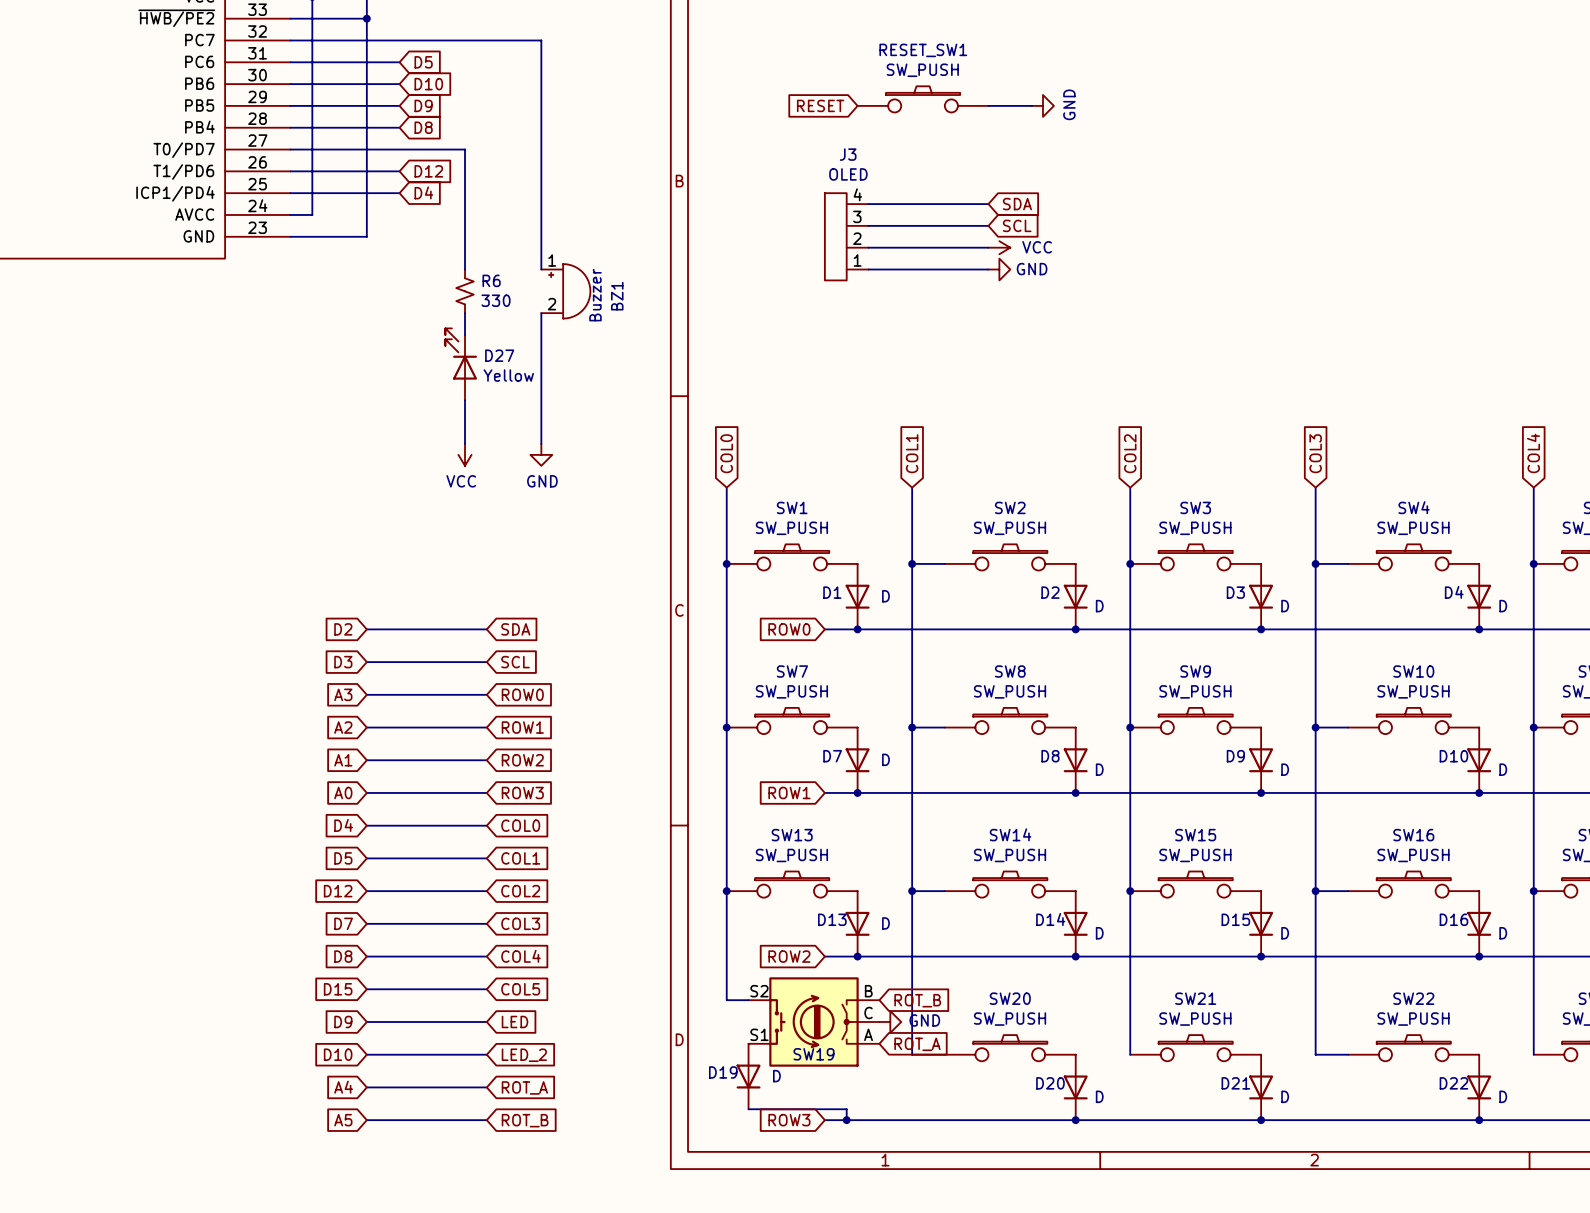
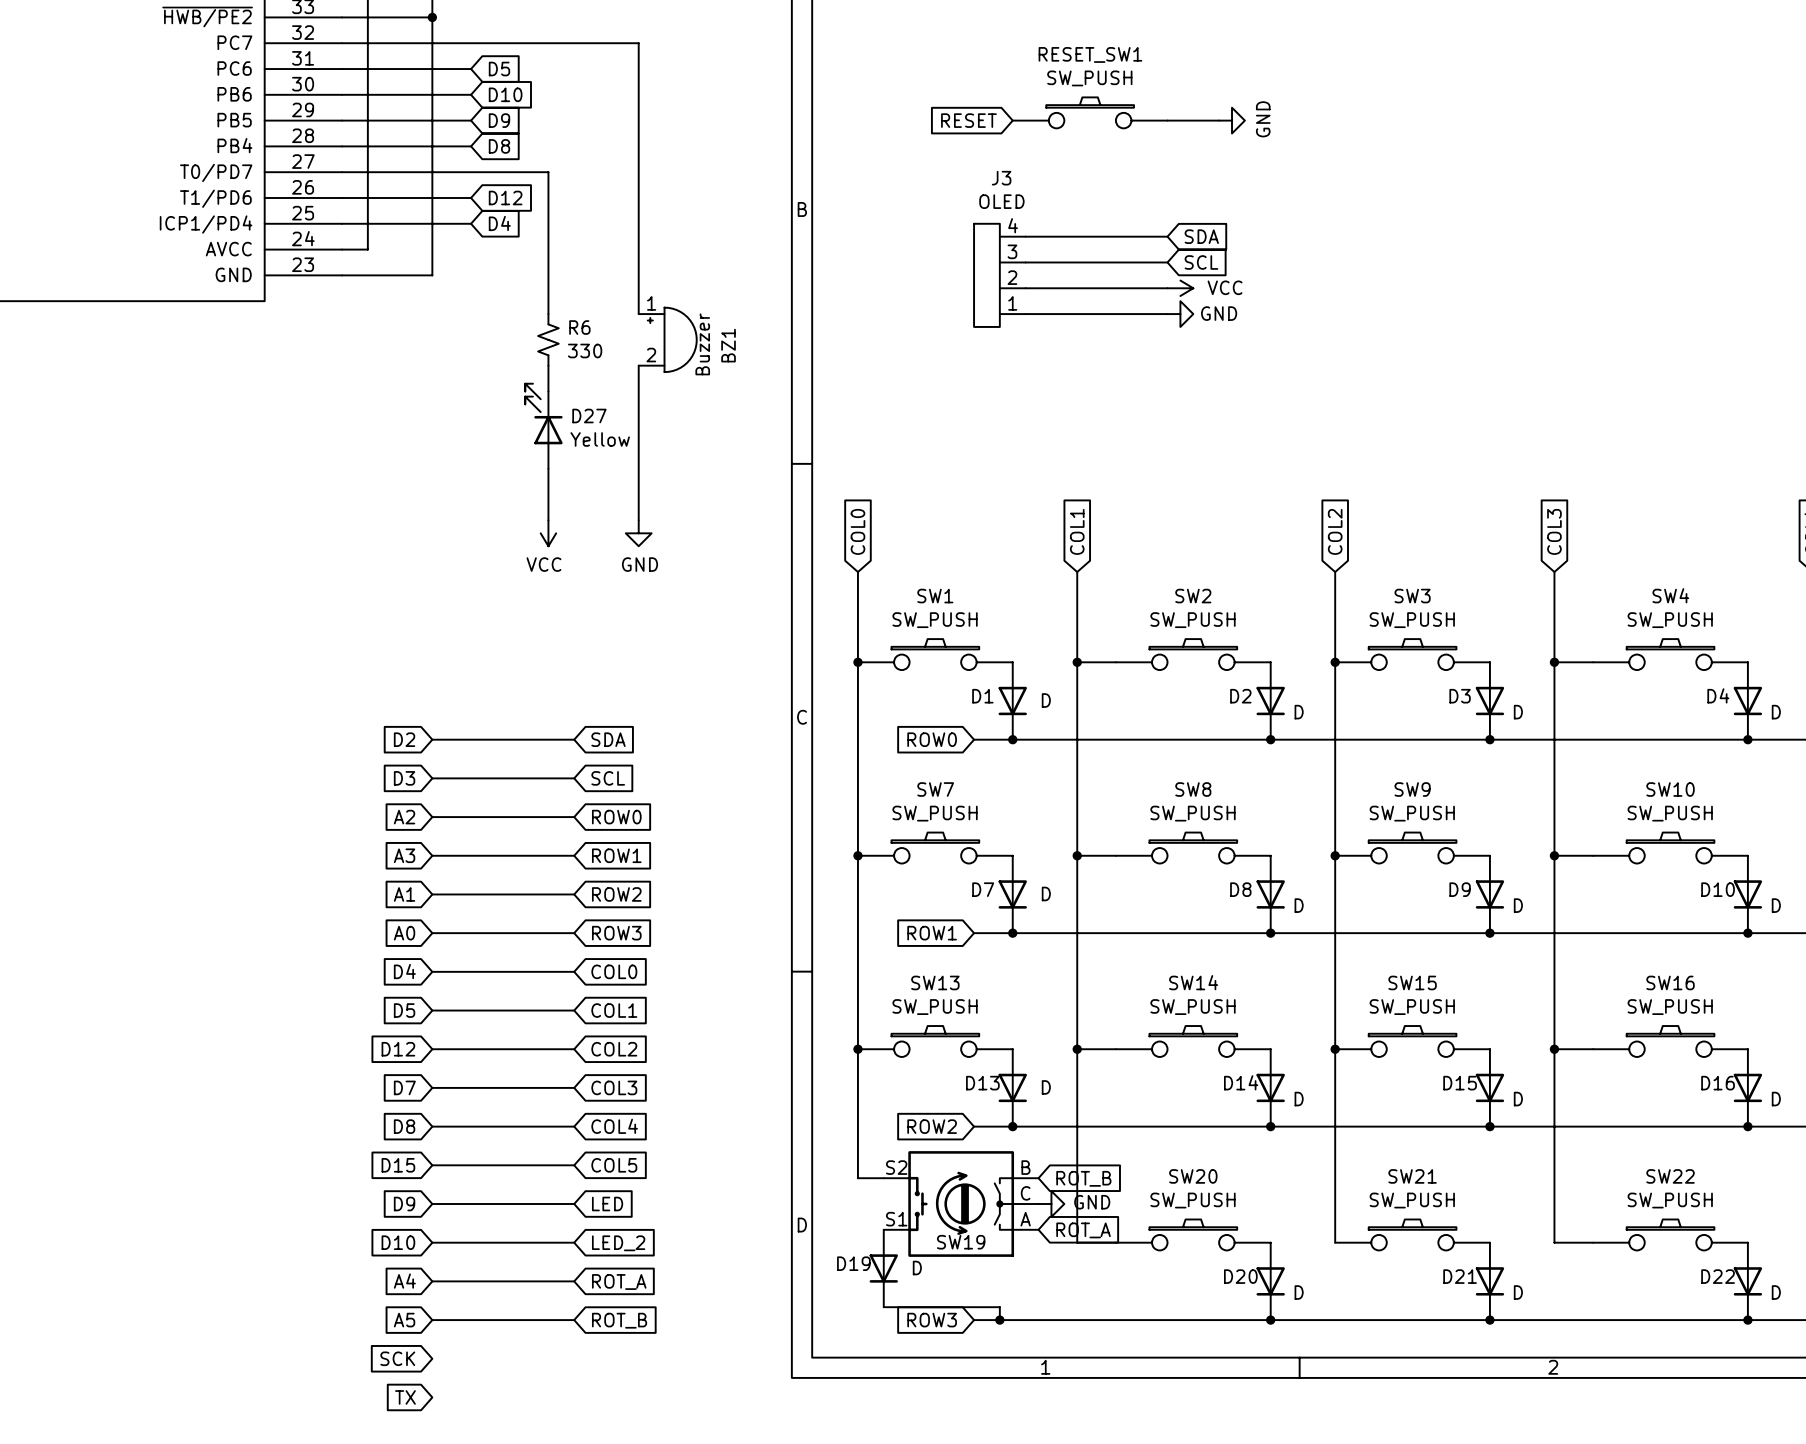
global label: A3 (343, 694) -> A2 (404, 817)
global label: A2 (343, 727) -> A3 (404, 855)
global label: none -> SCK (397, 1358)
global label: none -> TX (405, 1397)

